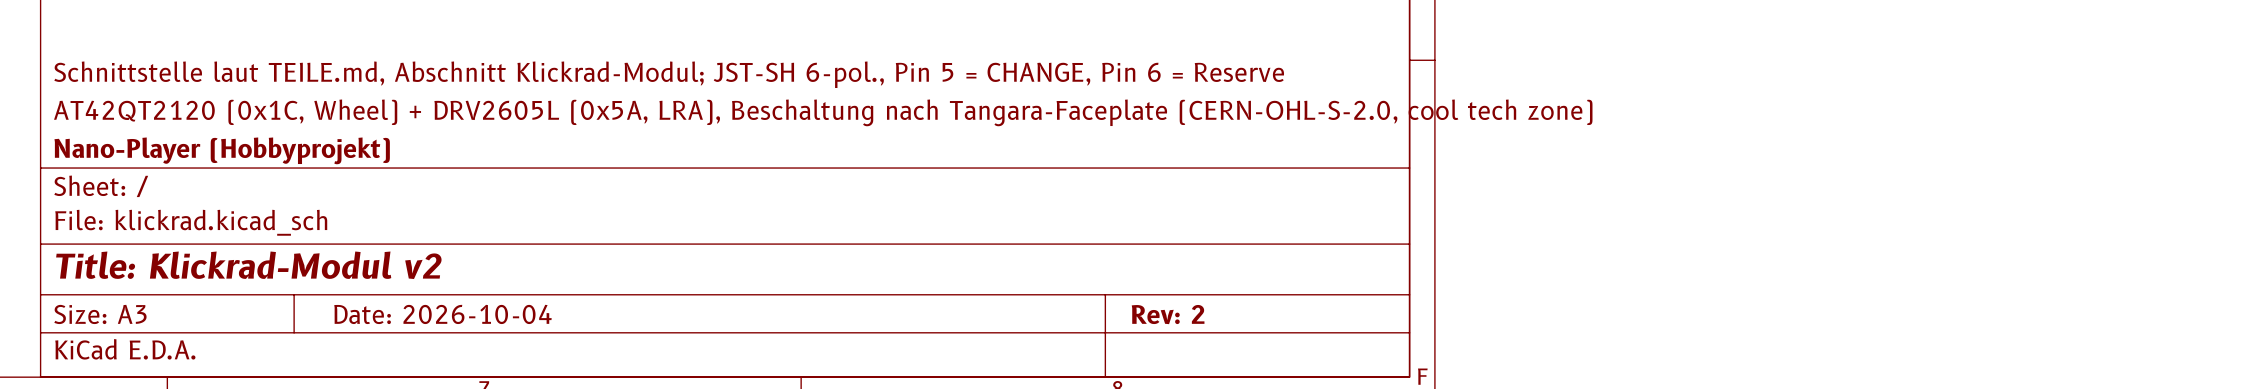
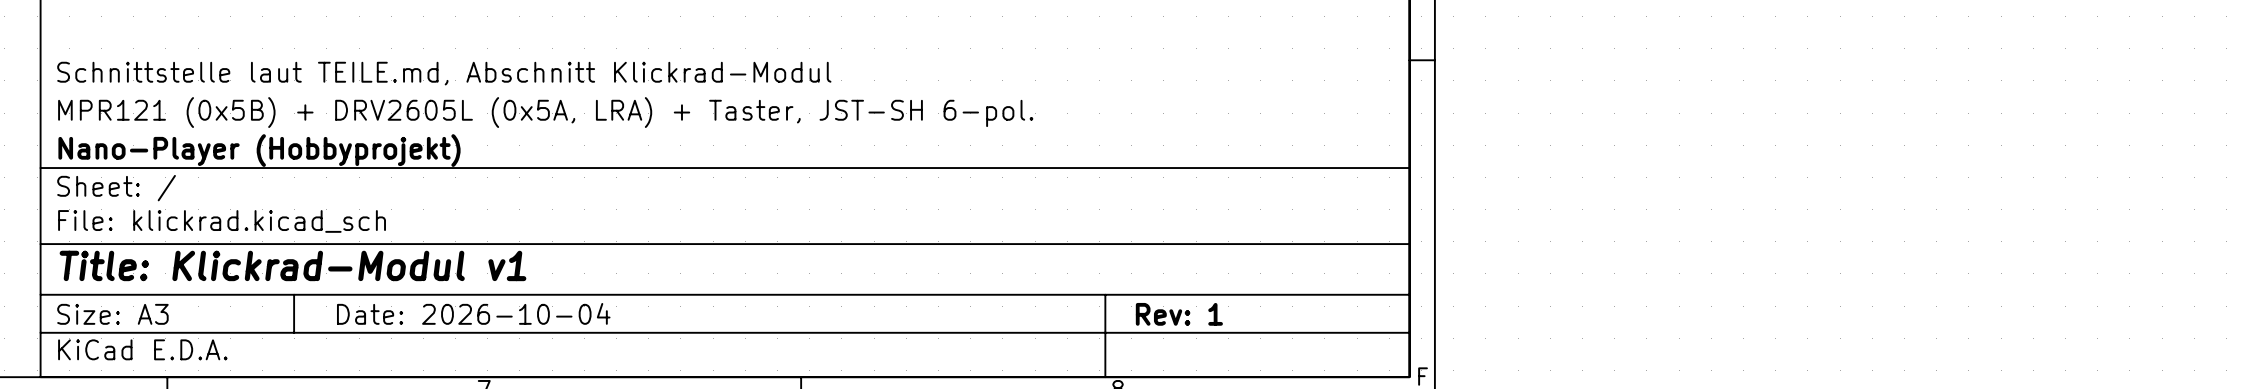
title block: Schnittstelle laut TEILE.md, Abschnitt Klickrad-Modul; JST-SH 6-pol., Pin 5 = CHANGE, Pin 6 = Reserve (669, 74) -> Schnittstelle laut TEILE.md, Abschnitt Klickrad-Modul (444, 73)
title block: AT42QT2120 (0x1C, Wheel) + DRV2605L (0x5A, LRA), Beschaltung nach Tangara-Faceplate (CERN-OHL-S-2.0, cool tech zone) (823, 112) -> MPR121 (0x5B) + DRV2605L (0x5A, LRA) + Taster, JST-SH 6-pol. (545, 112)
title block: Title: Klickrad-Modul v2 (248, 265) -> Title: Klickrad-Modul v1 (292, 265)
title block: Rev: 2 (1168, 314) -> Rev: 1 (1179, 314)

